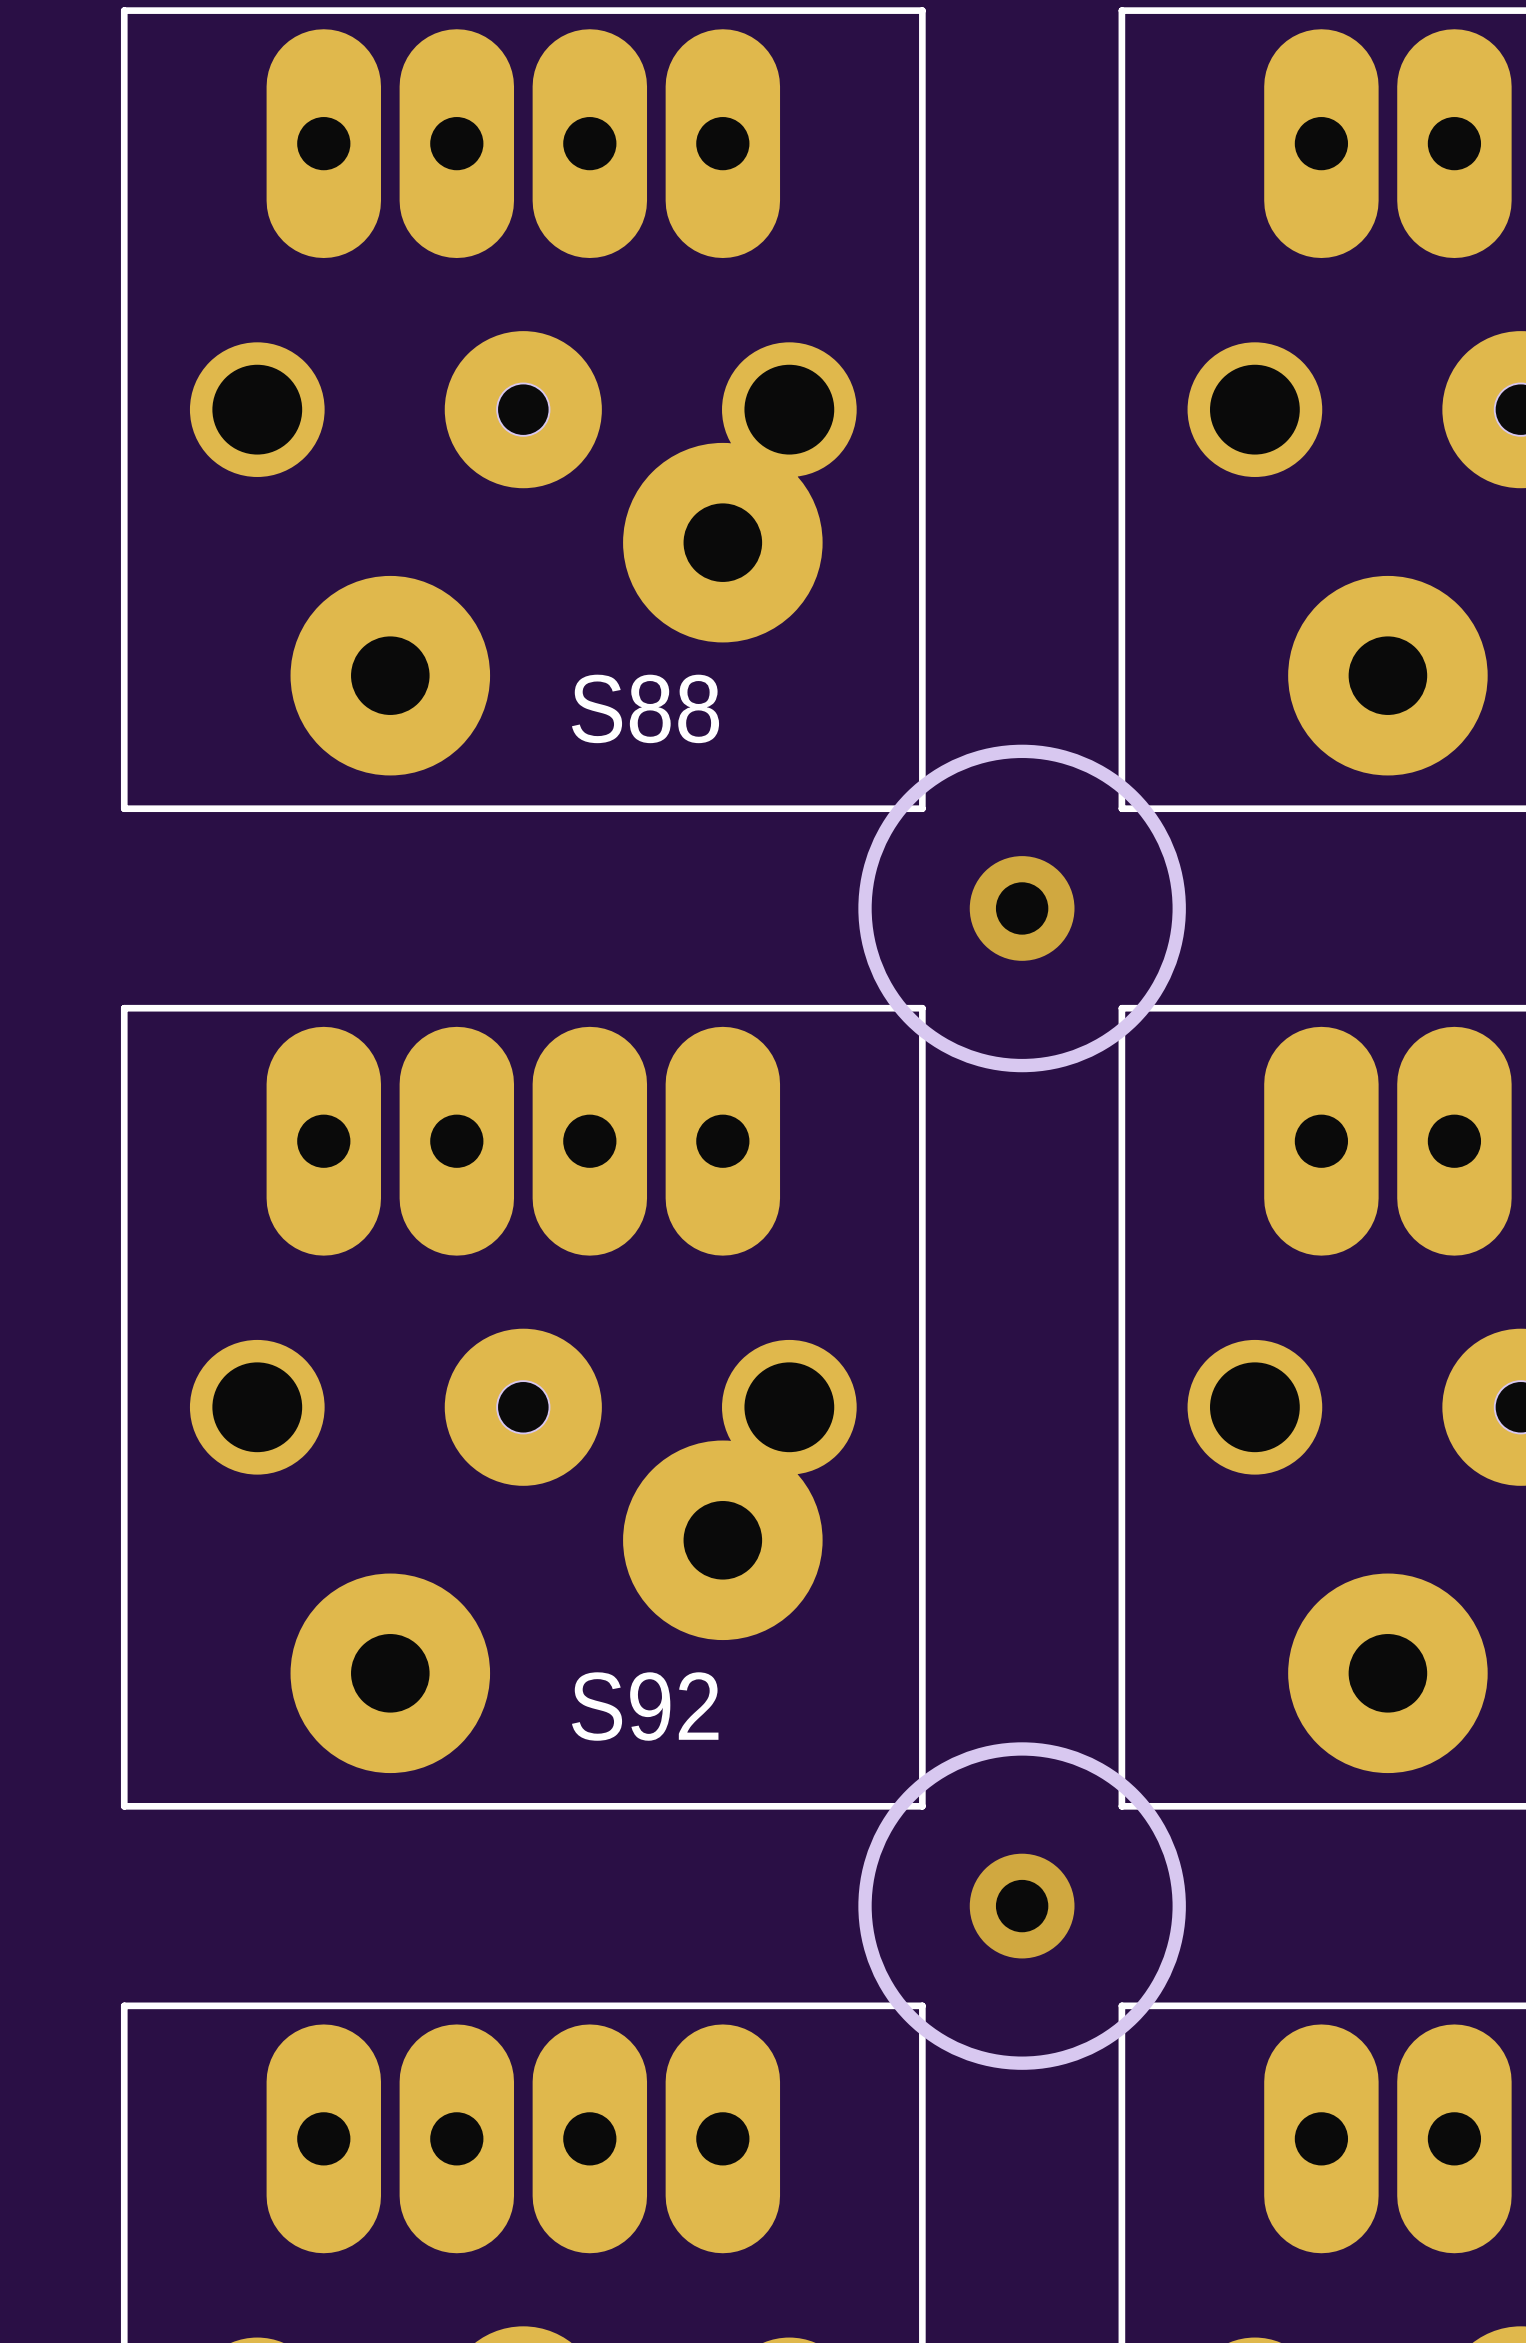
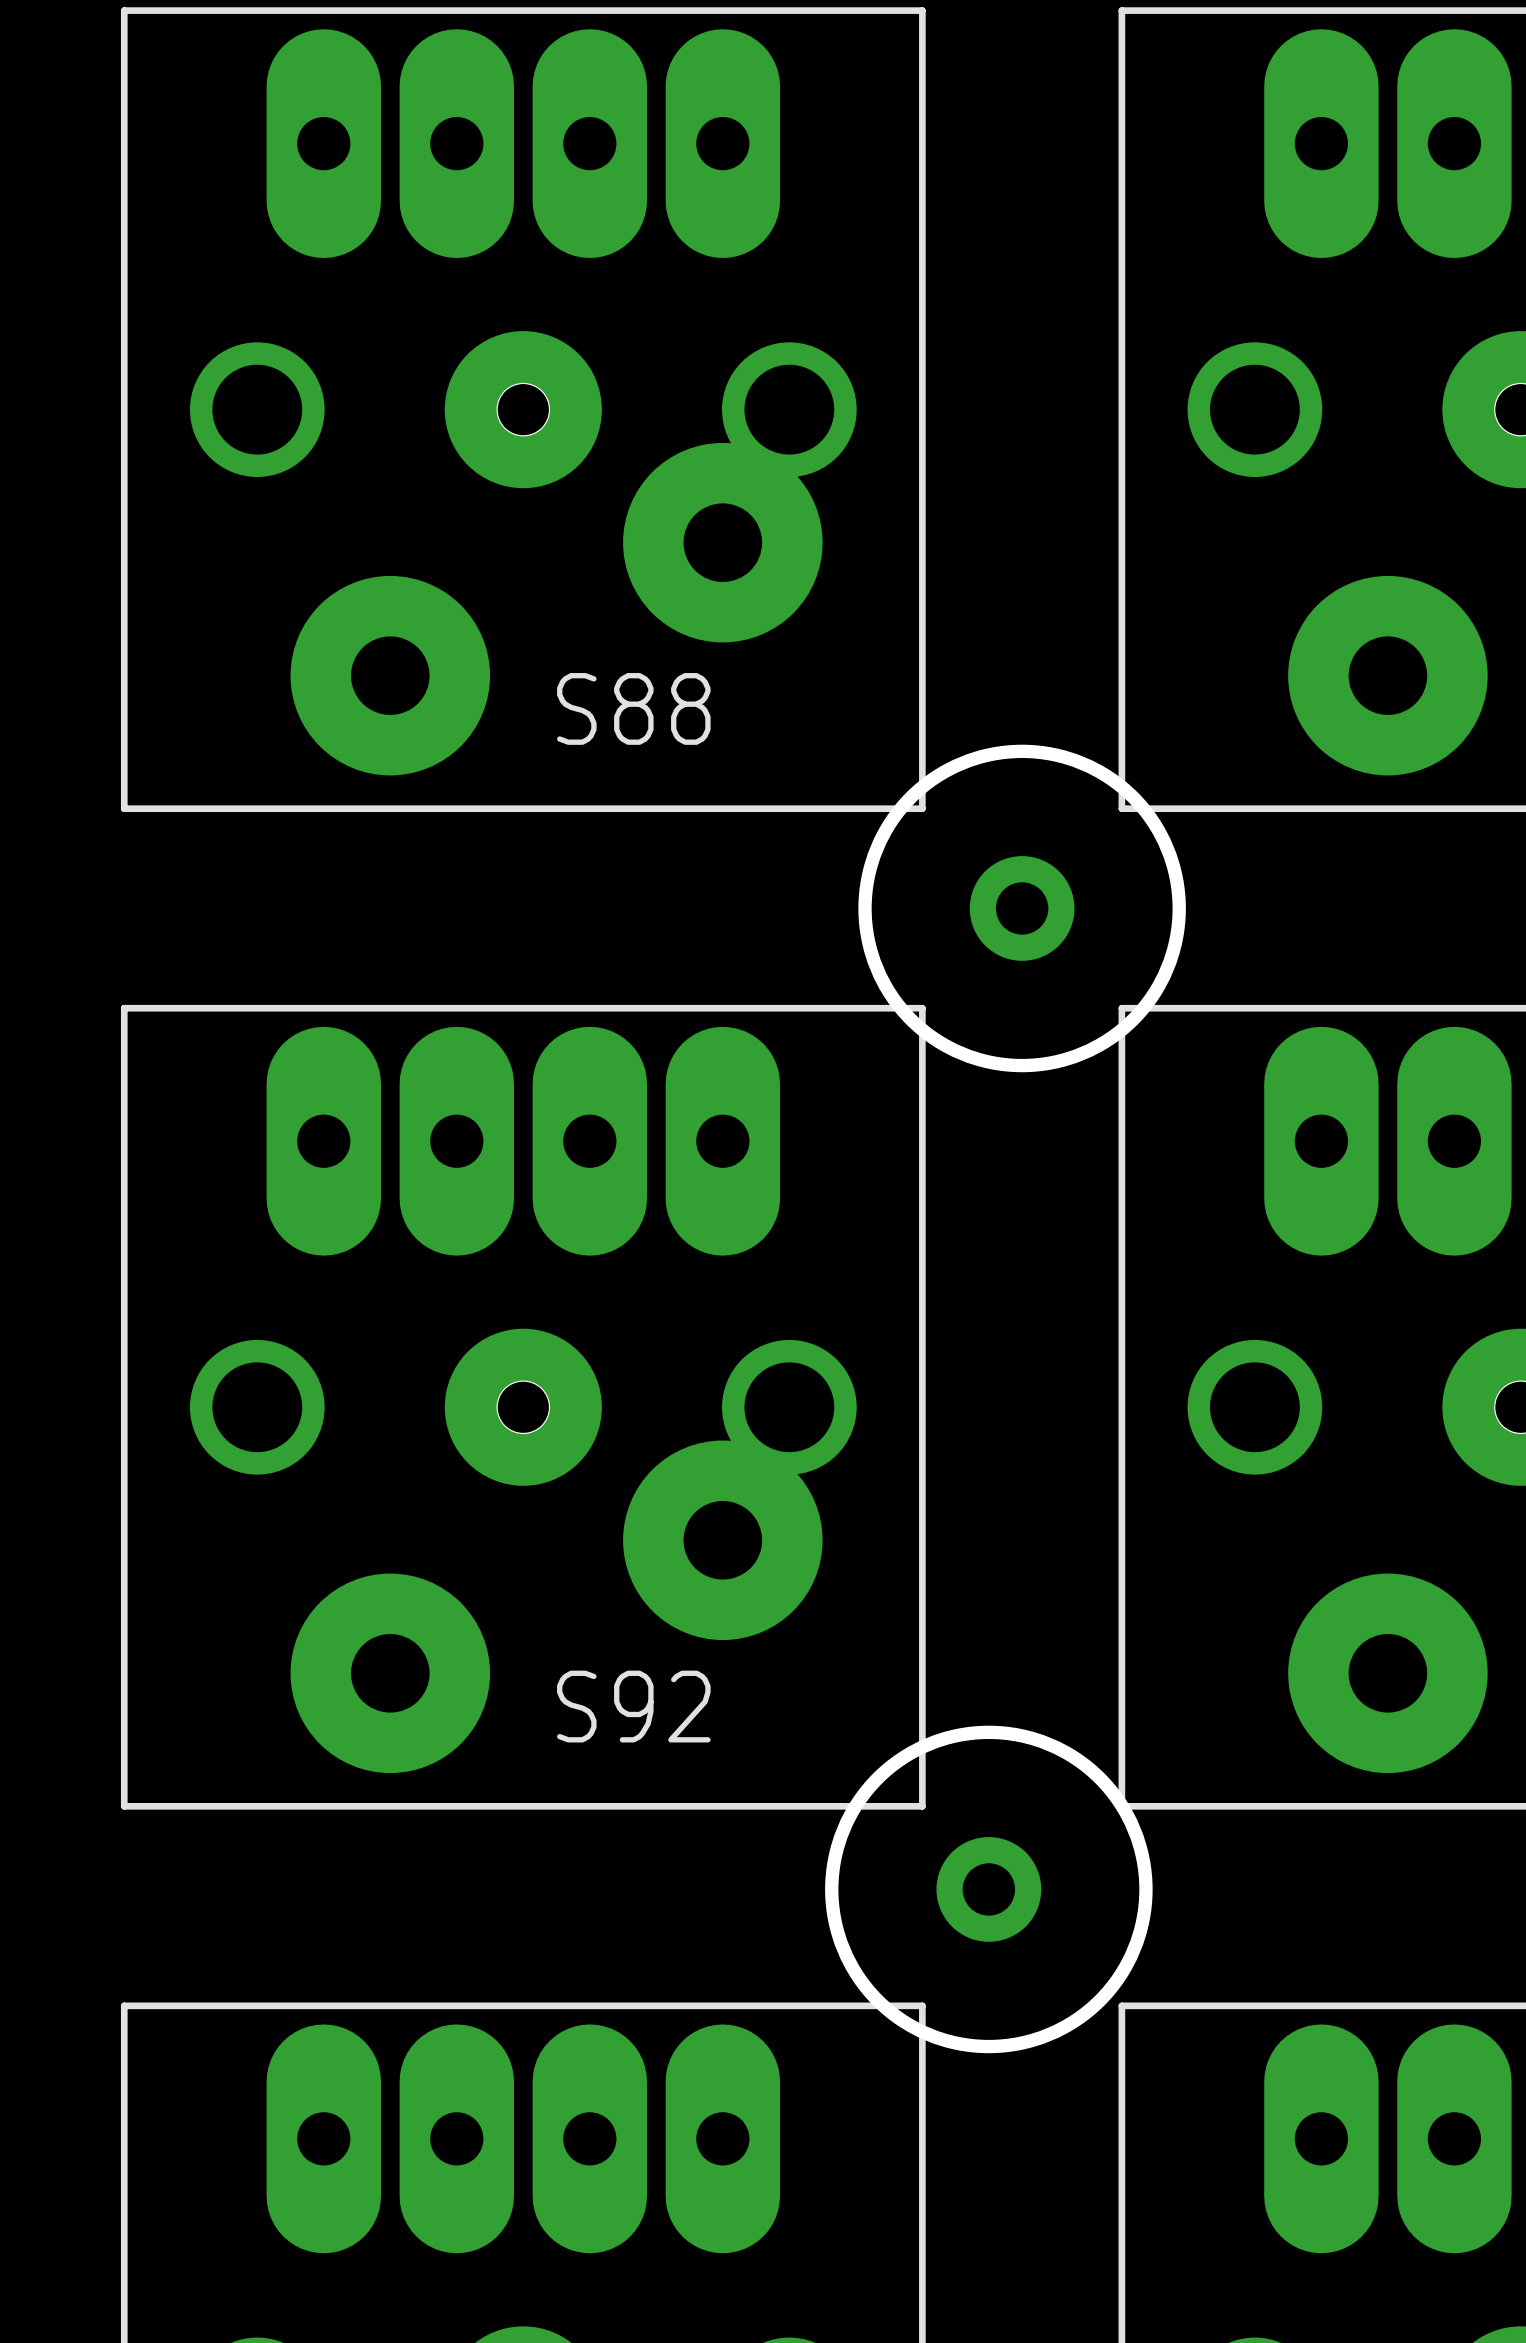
round board edge position: (1022, 1906) -> (988, 1889)
via position: (1022, 1906) -> (988, 1889)

